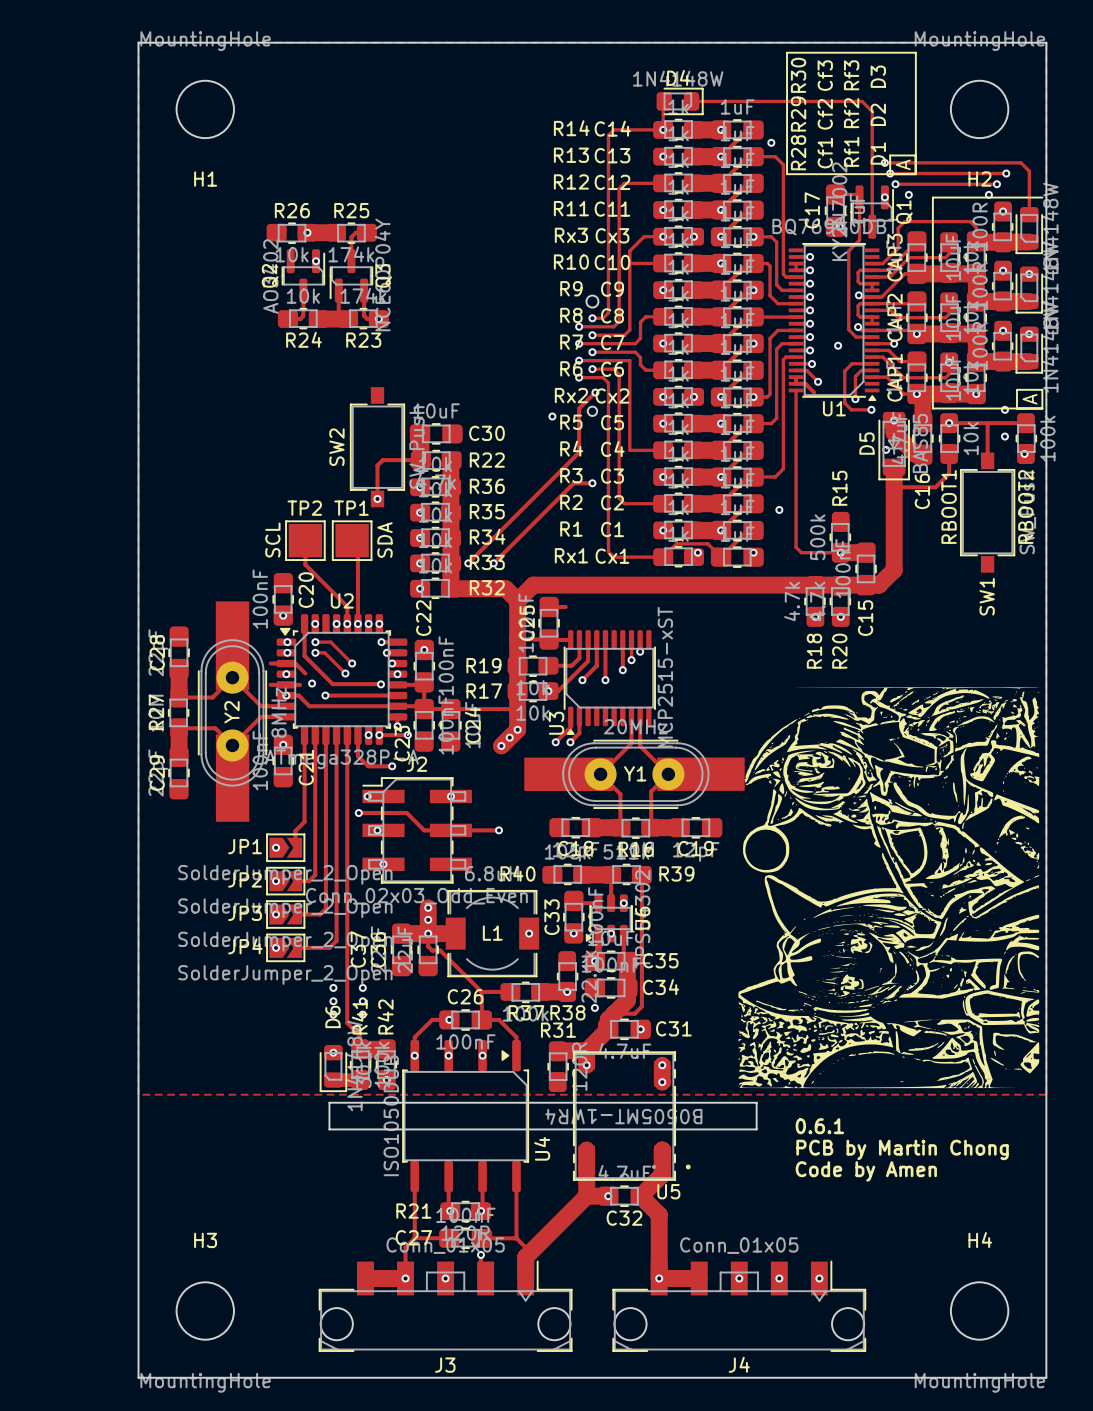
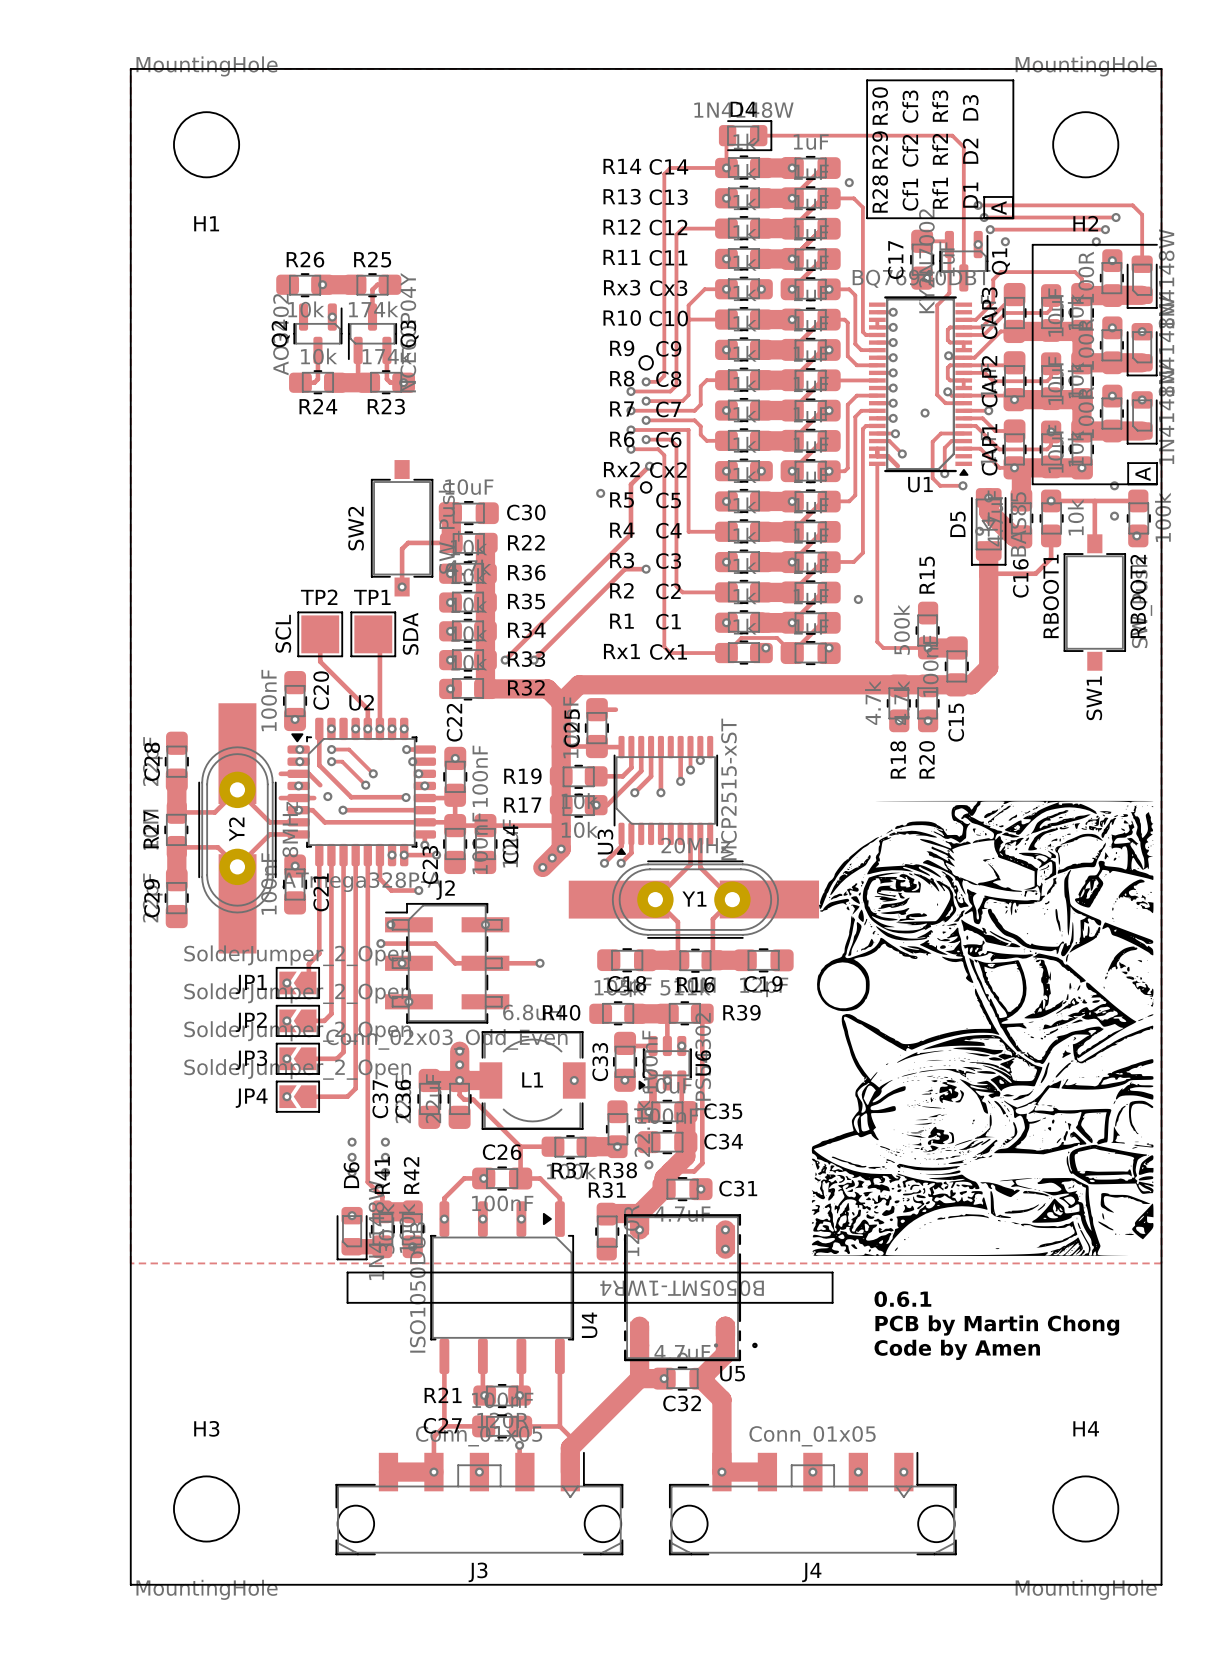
JP1 rotation: 0° (285, 847) -> 180° (297, 982)
JP2 rotation: 0° (285, 881) -> 180° (297, 1020)
JP3 rotation: 0° (285, 914) -> 180° (297, 1058)
JP4 rotation: 0° (285, 947) -> 180° (297, 1096)

